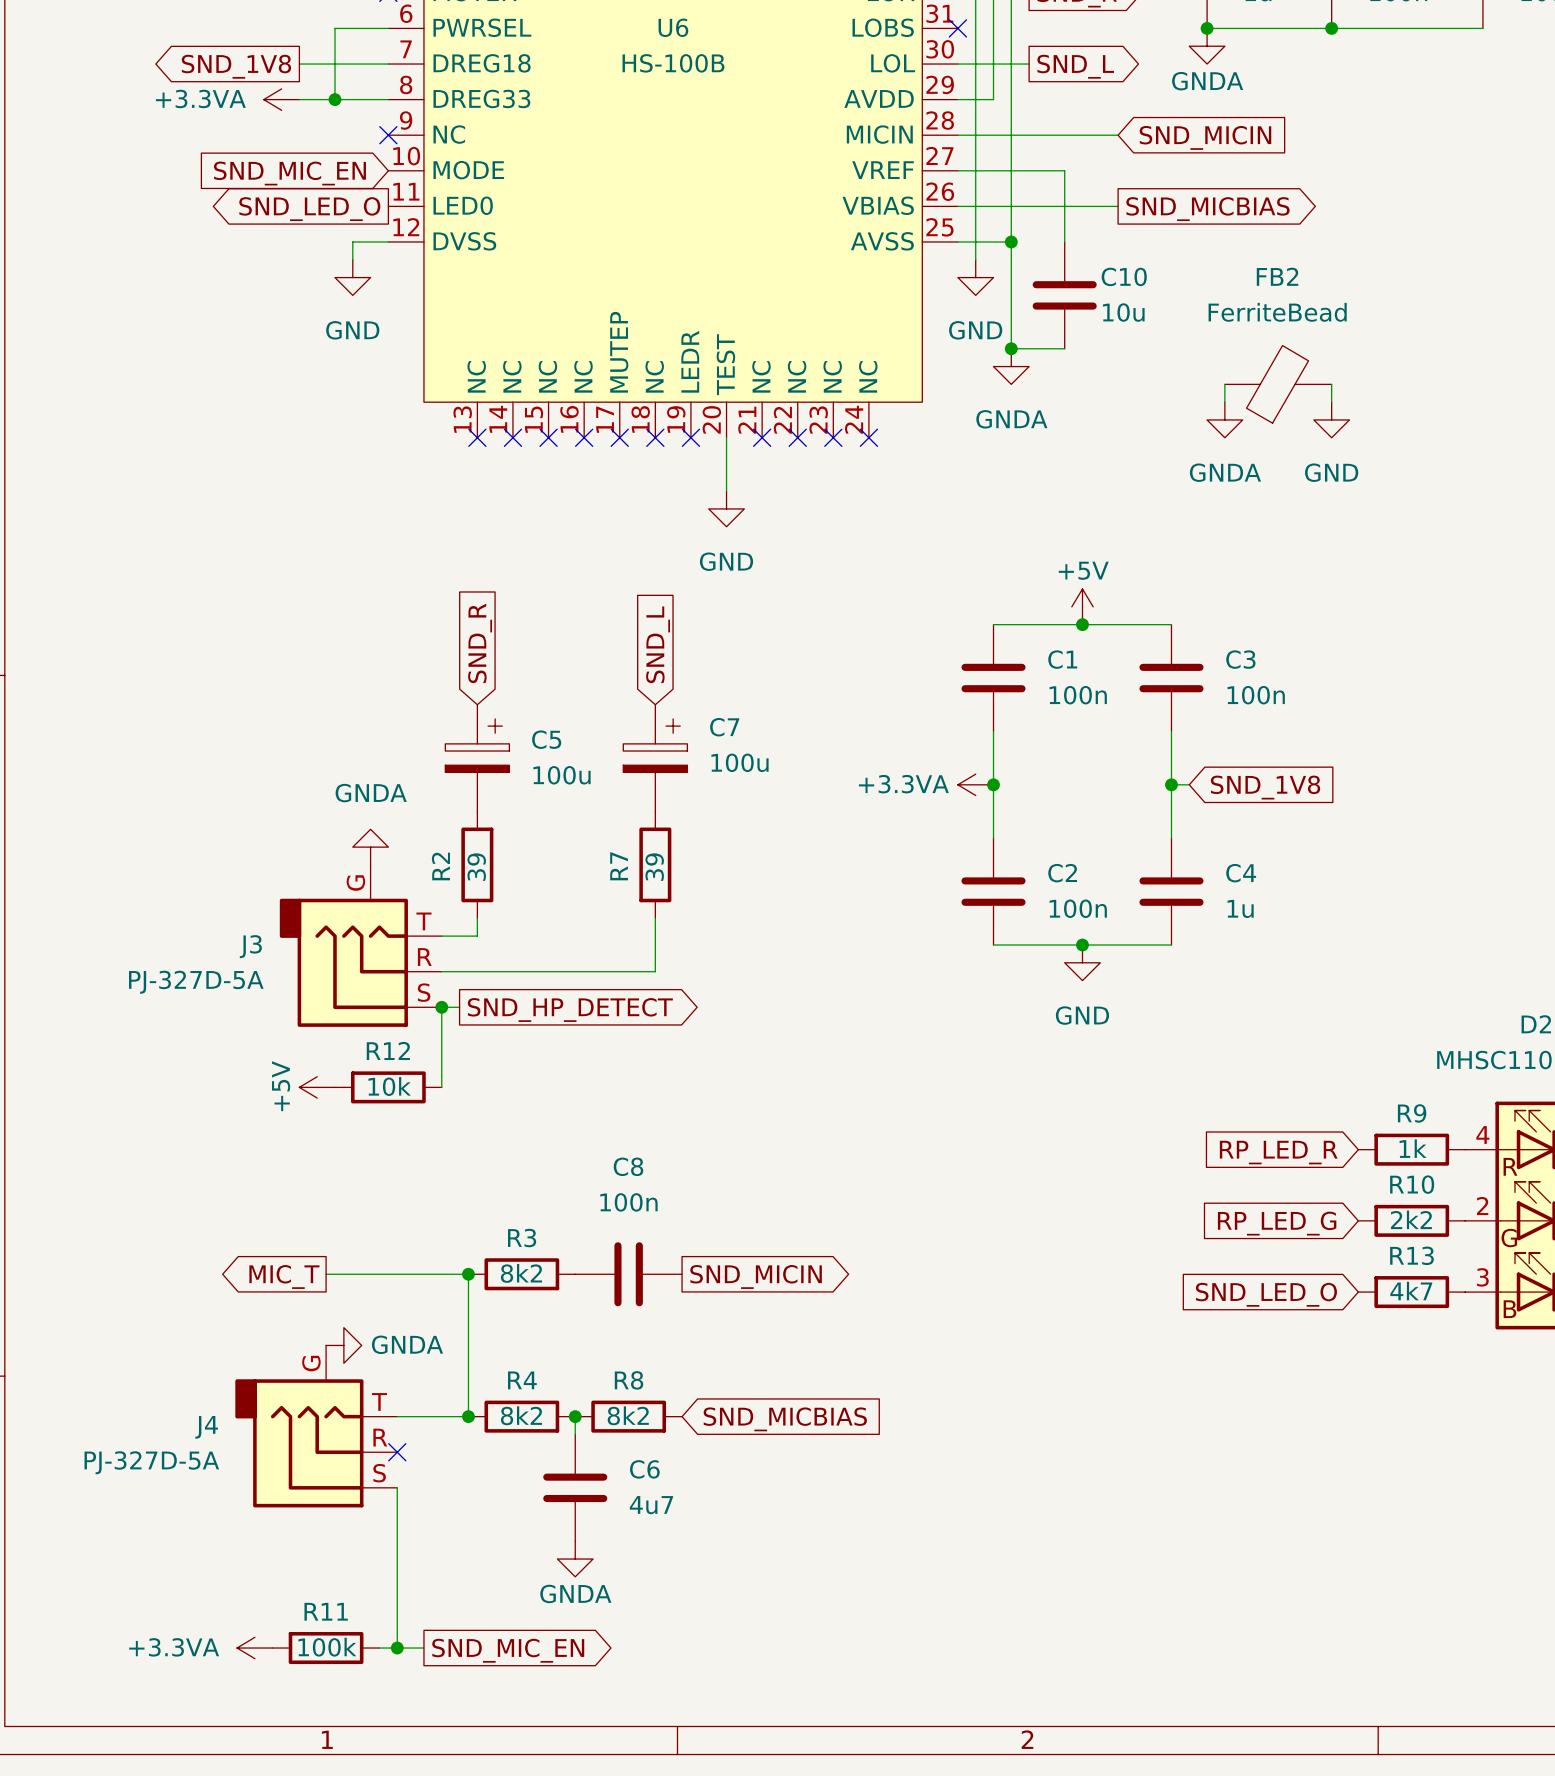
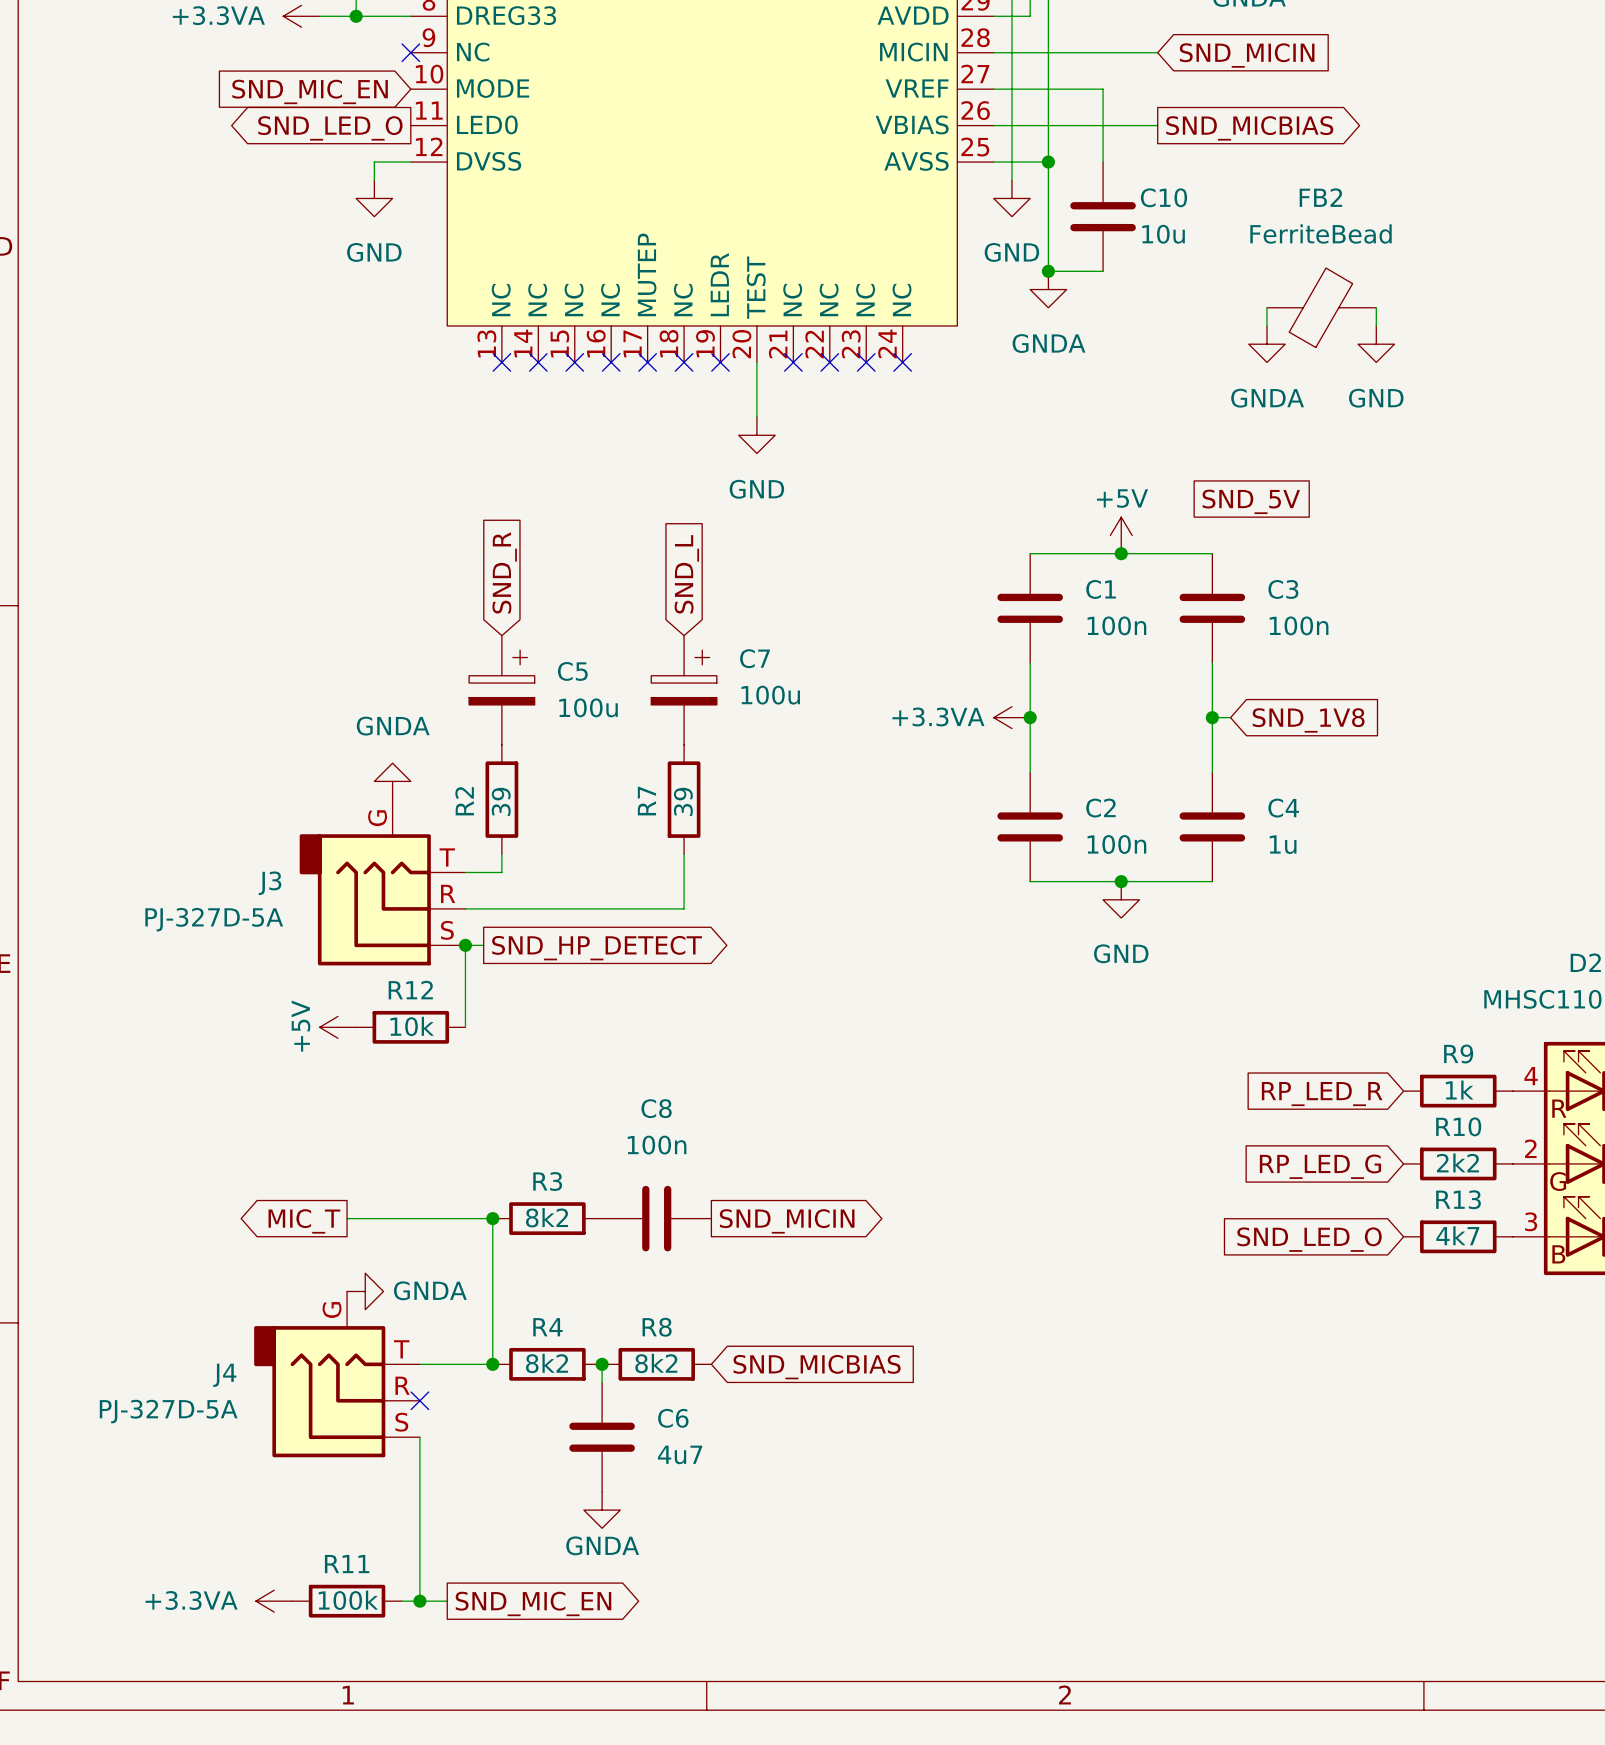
global label: none -> SND_5V (1251, 501)

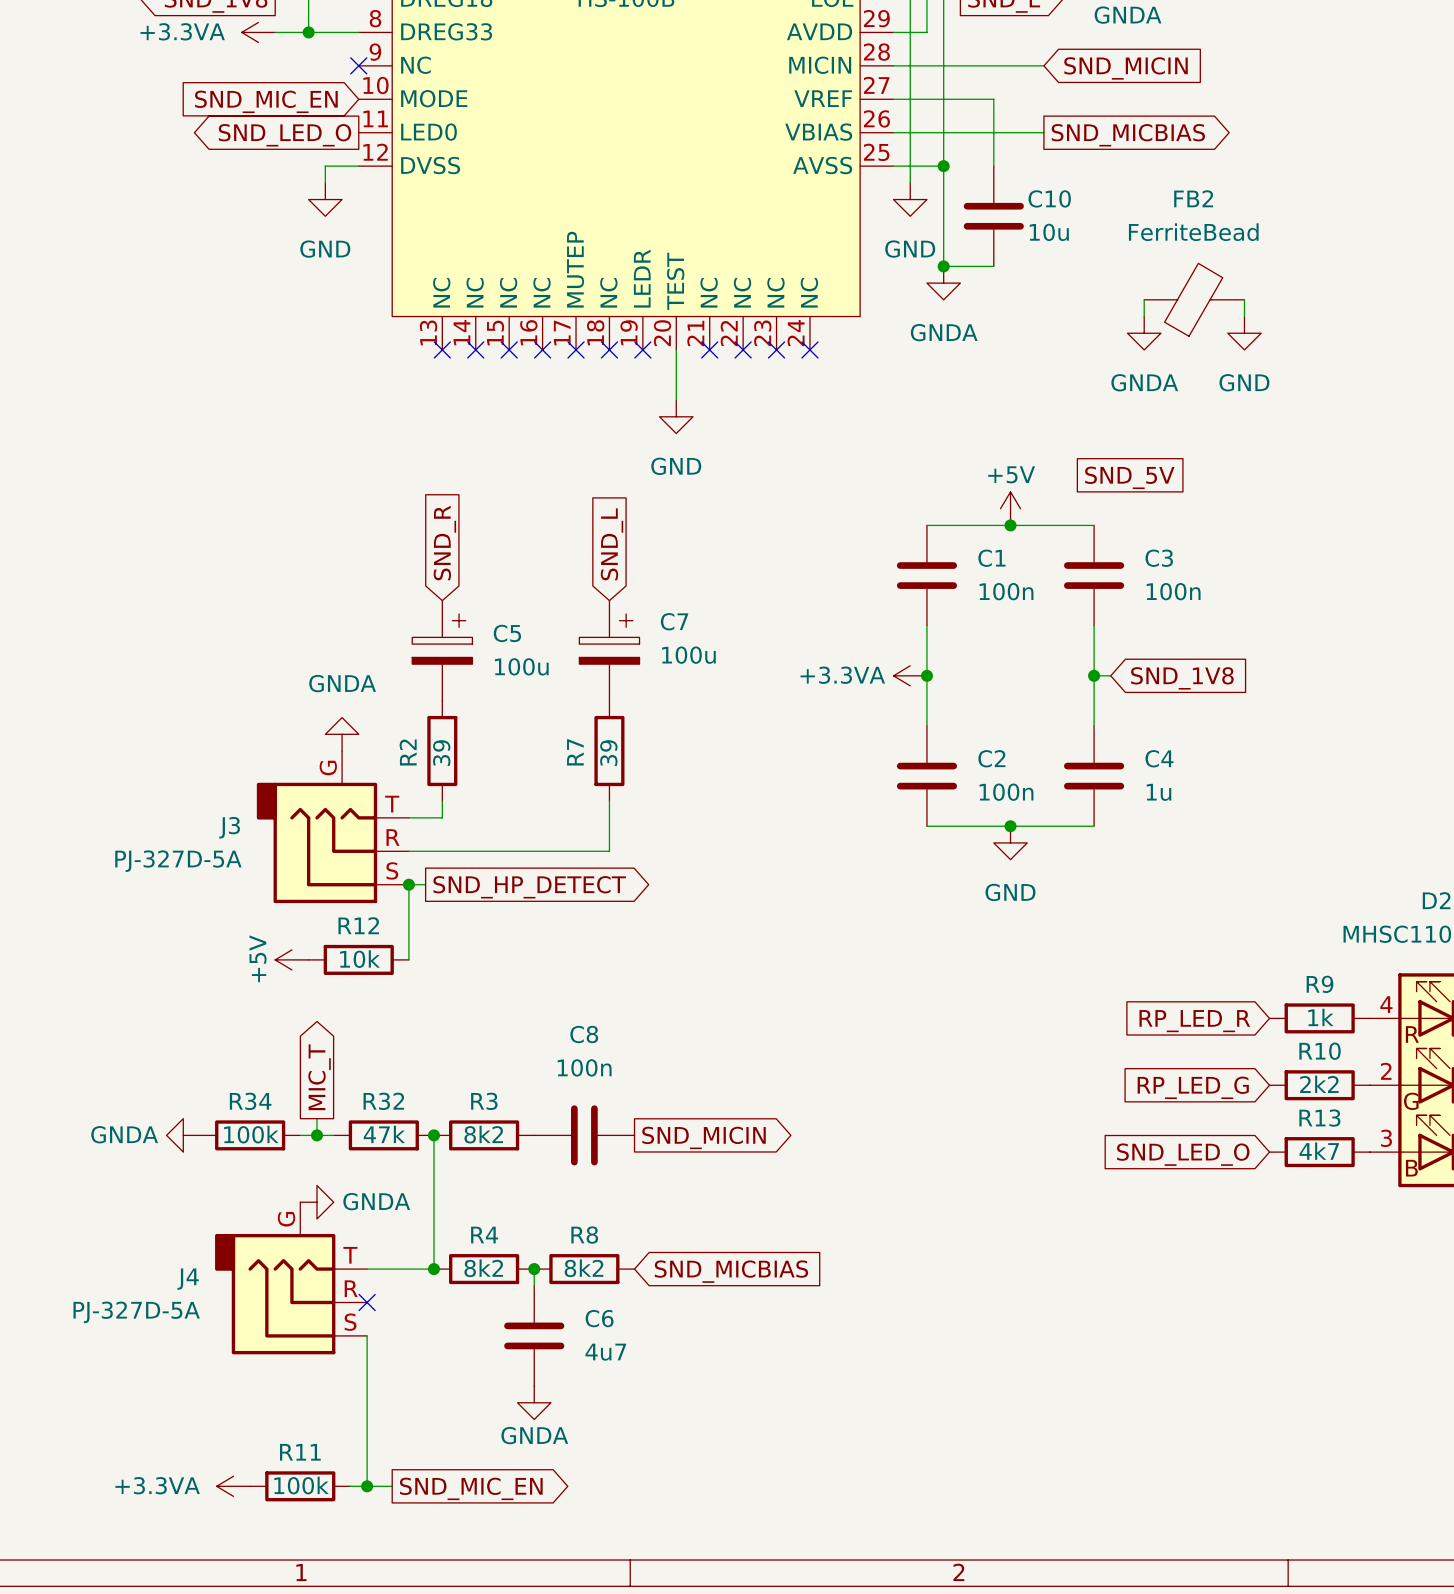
wire: none -> (316, 1118) (316, 1135)
power symbol: none -> GNDA (183, 1135)
R34: none -> 100k (250, 1135)
junction: none -> (316, 1135)
wire: (383, 1218) (492, 1218) -> none
R32: none -> 47k (383, 1135)
global label rotation: 0° (304, 1221) -> 90° clockwise (319, 1077)

